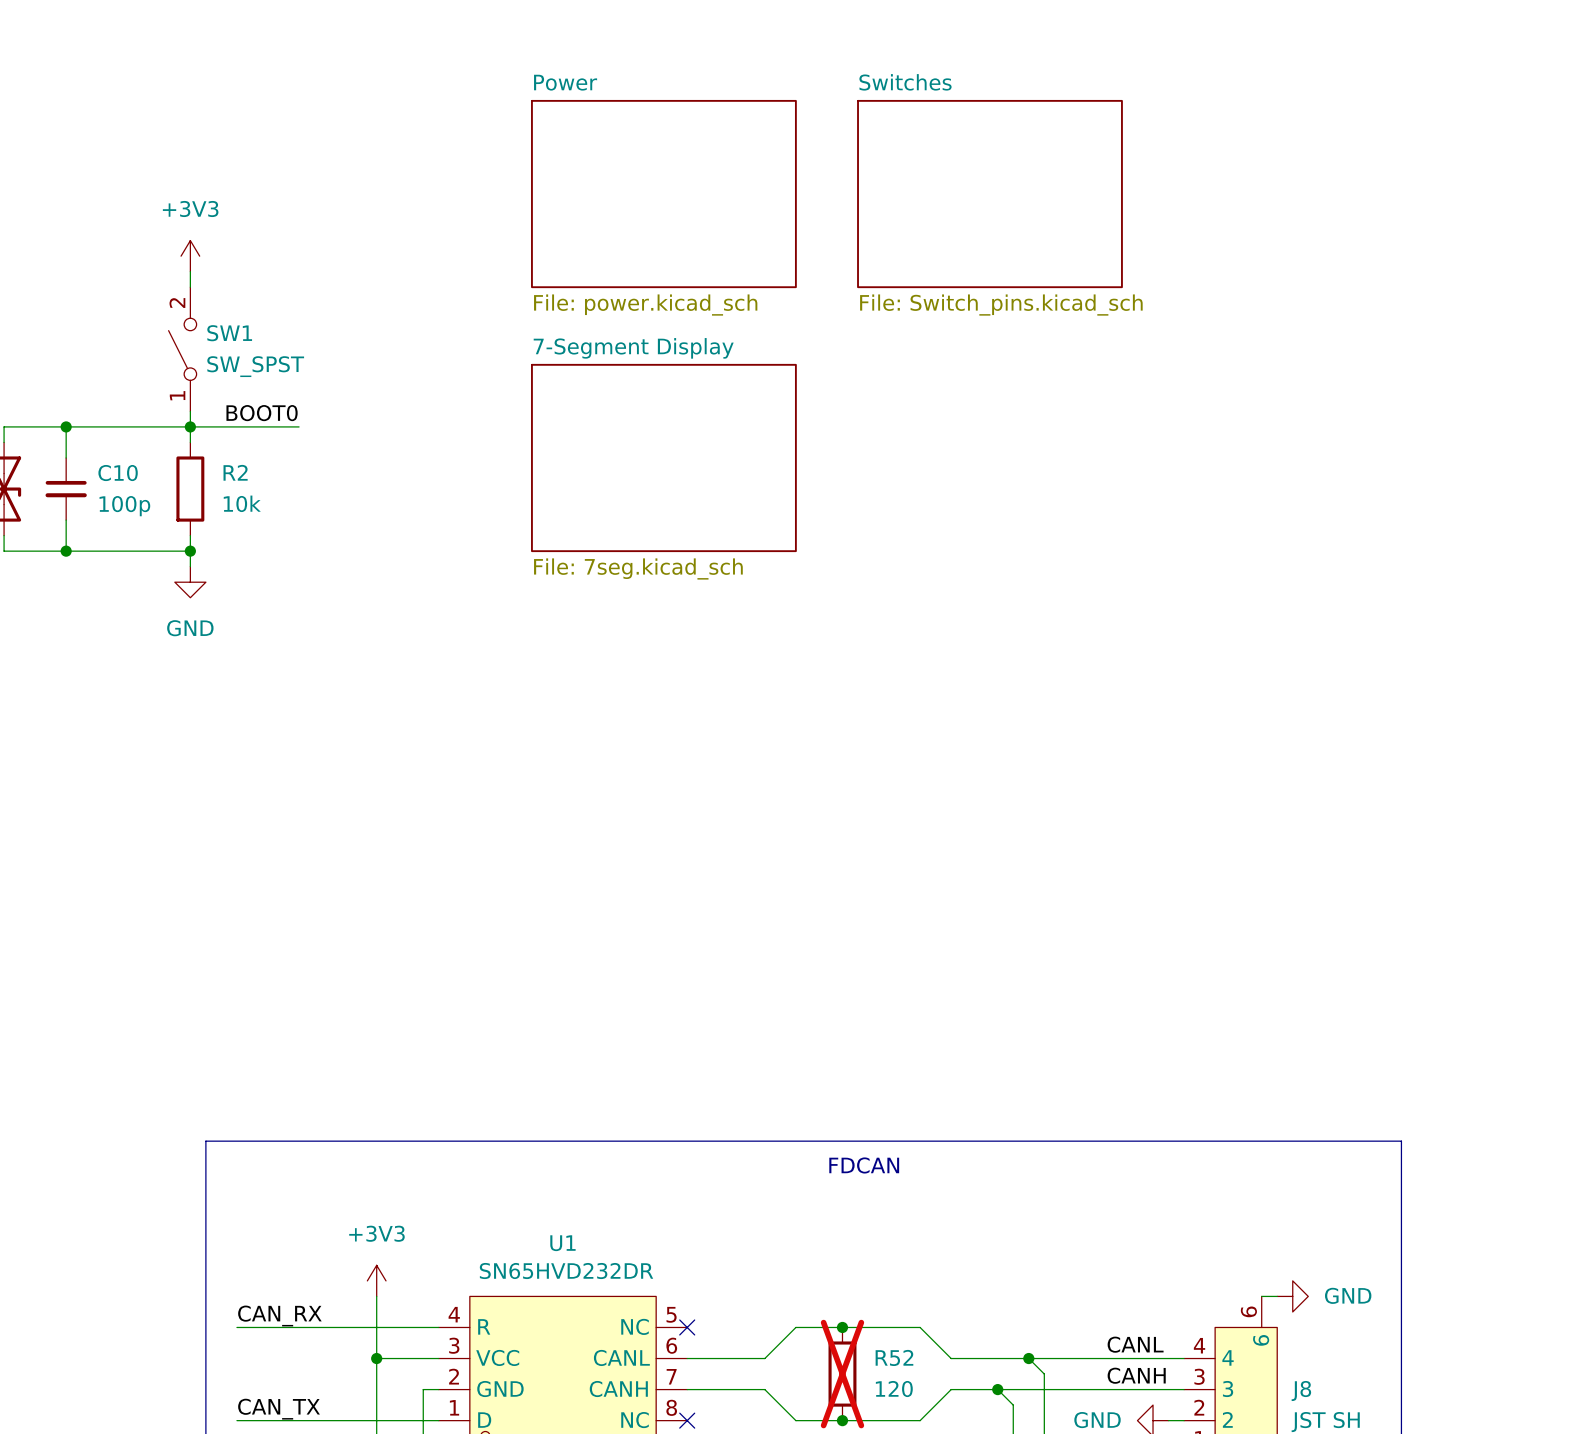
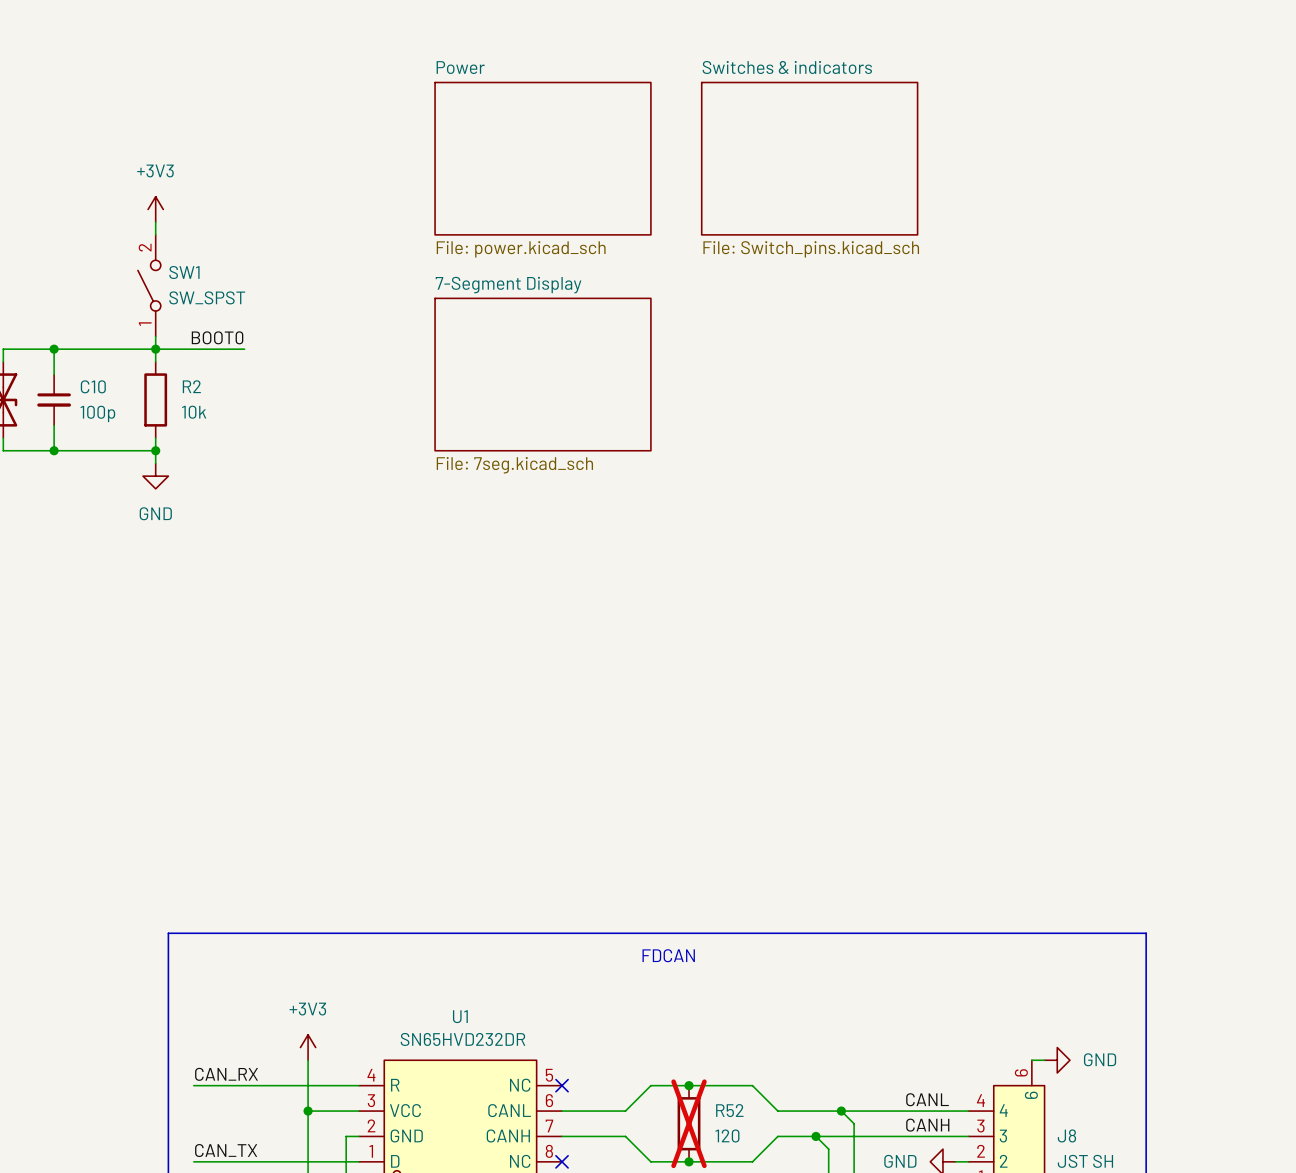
sheet Switches name: Switches (905, 82) -> Switches & indicators (787, 67)
text position: FDCAN (864, 1165) -> FDCAN (668, 955)

